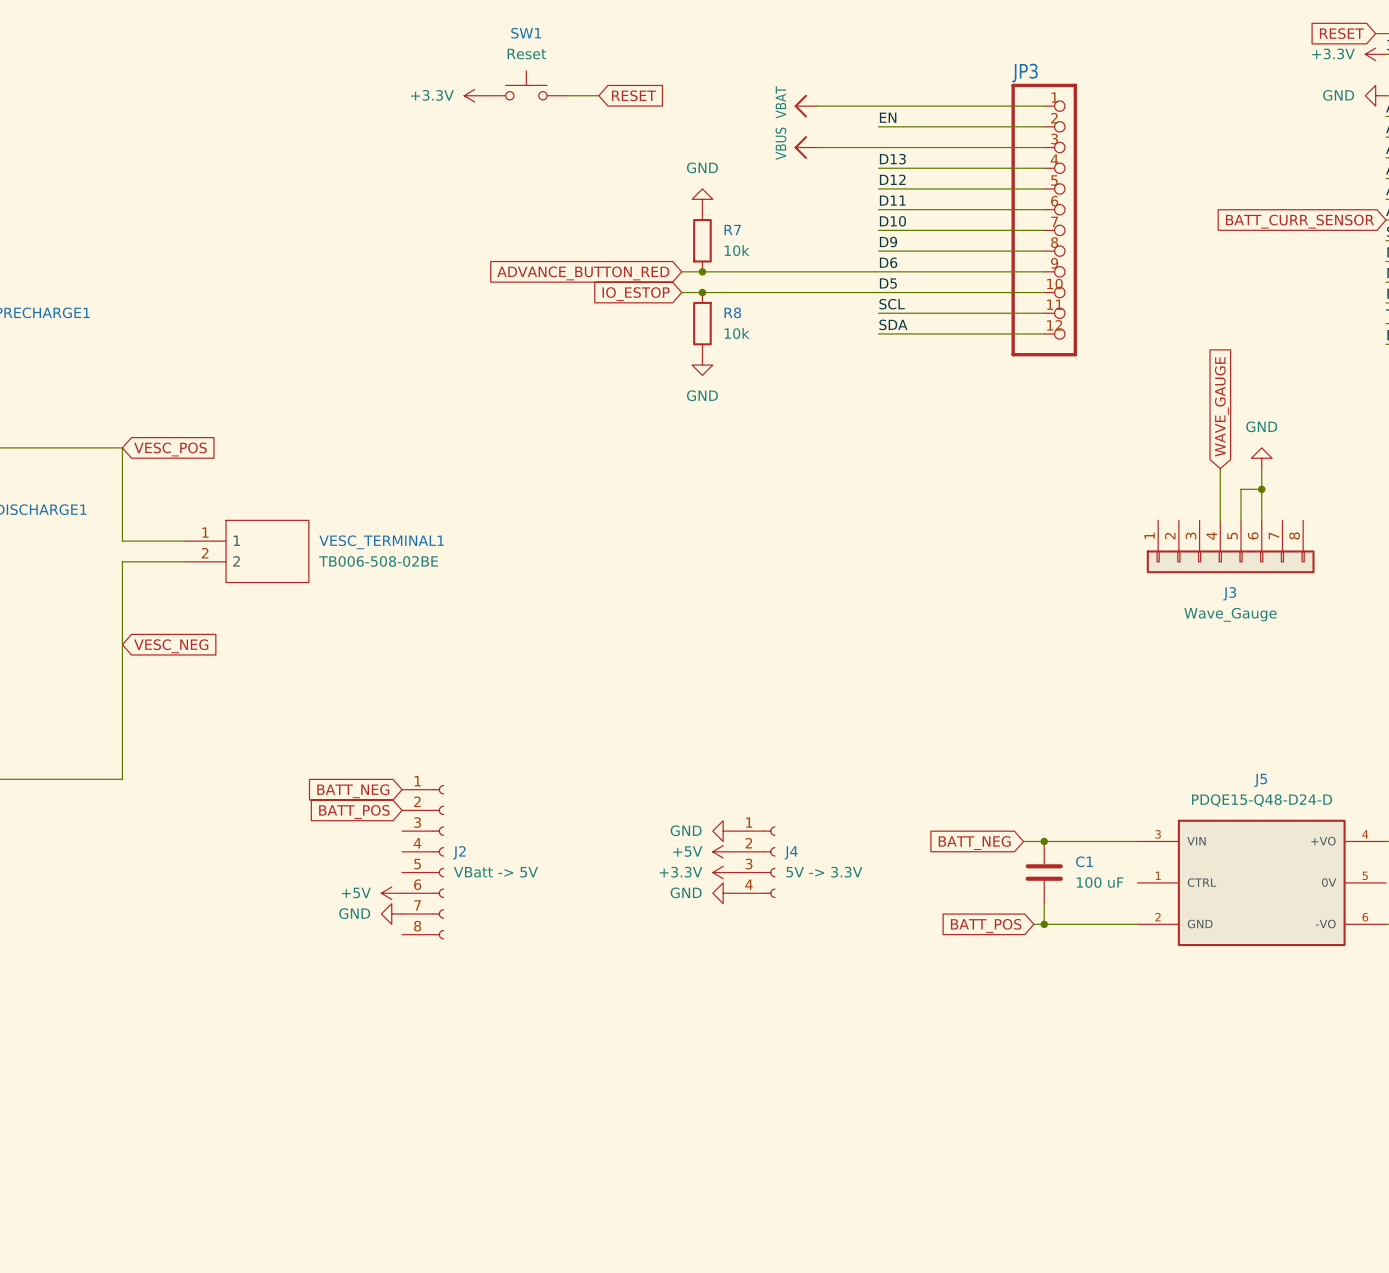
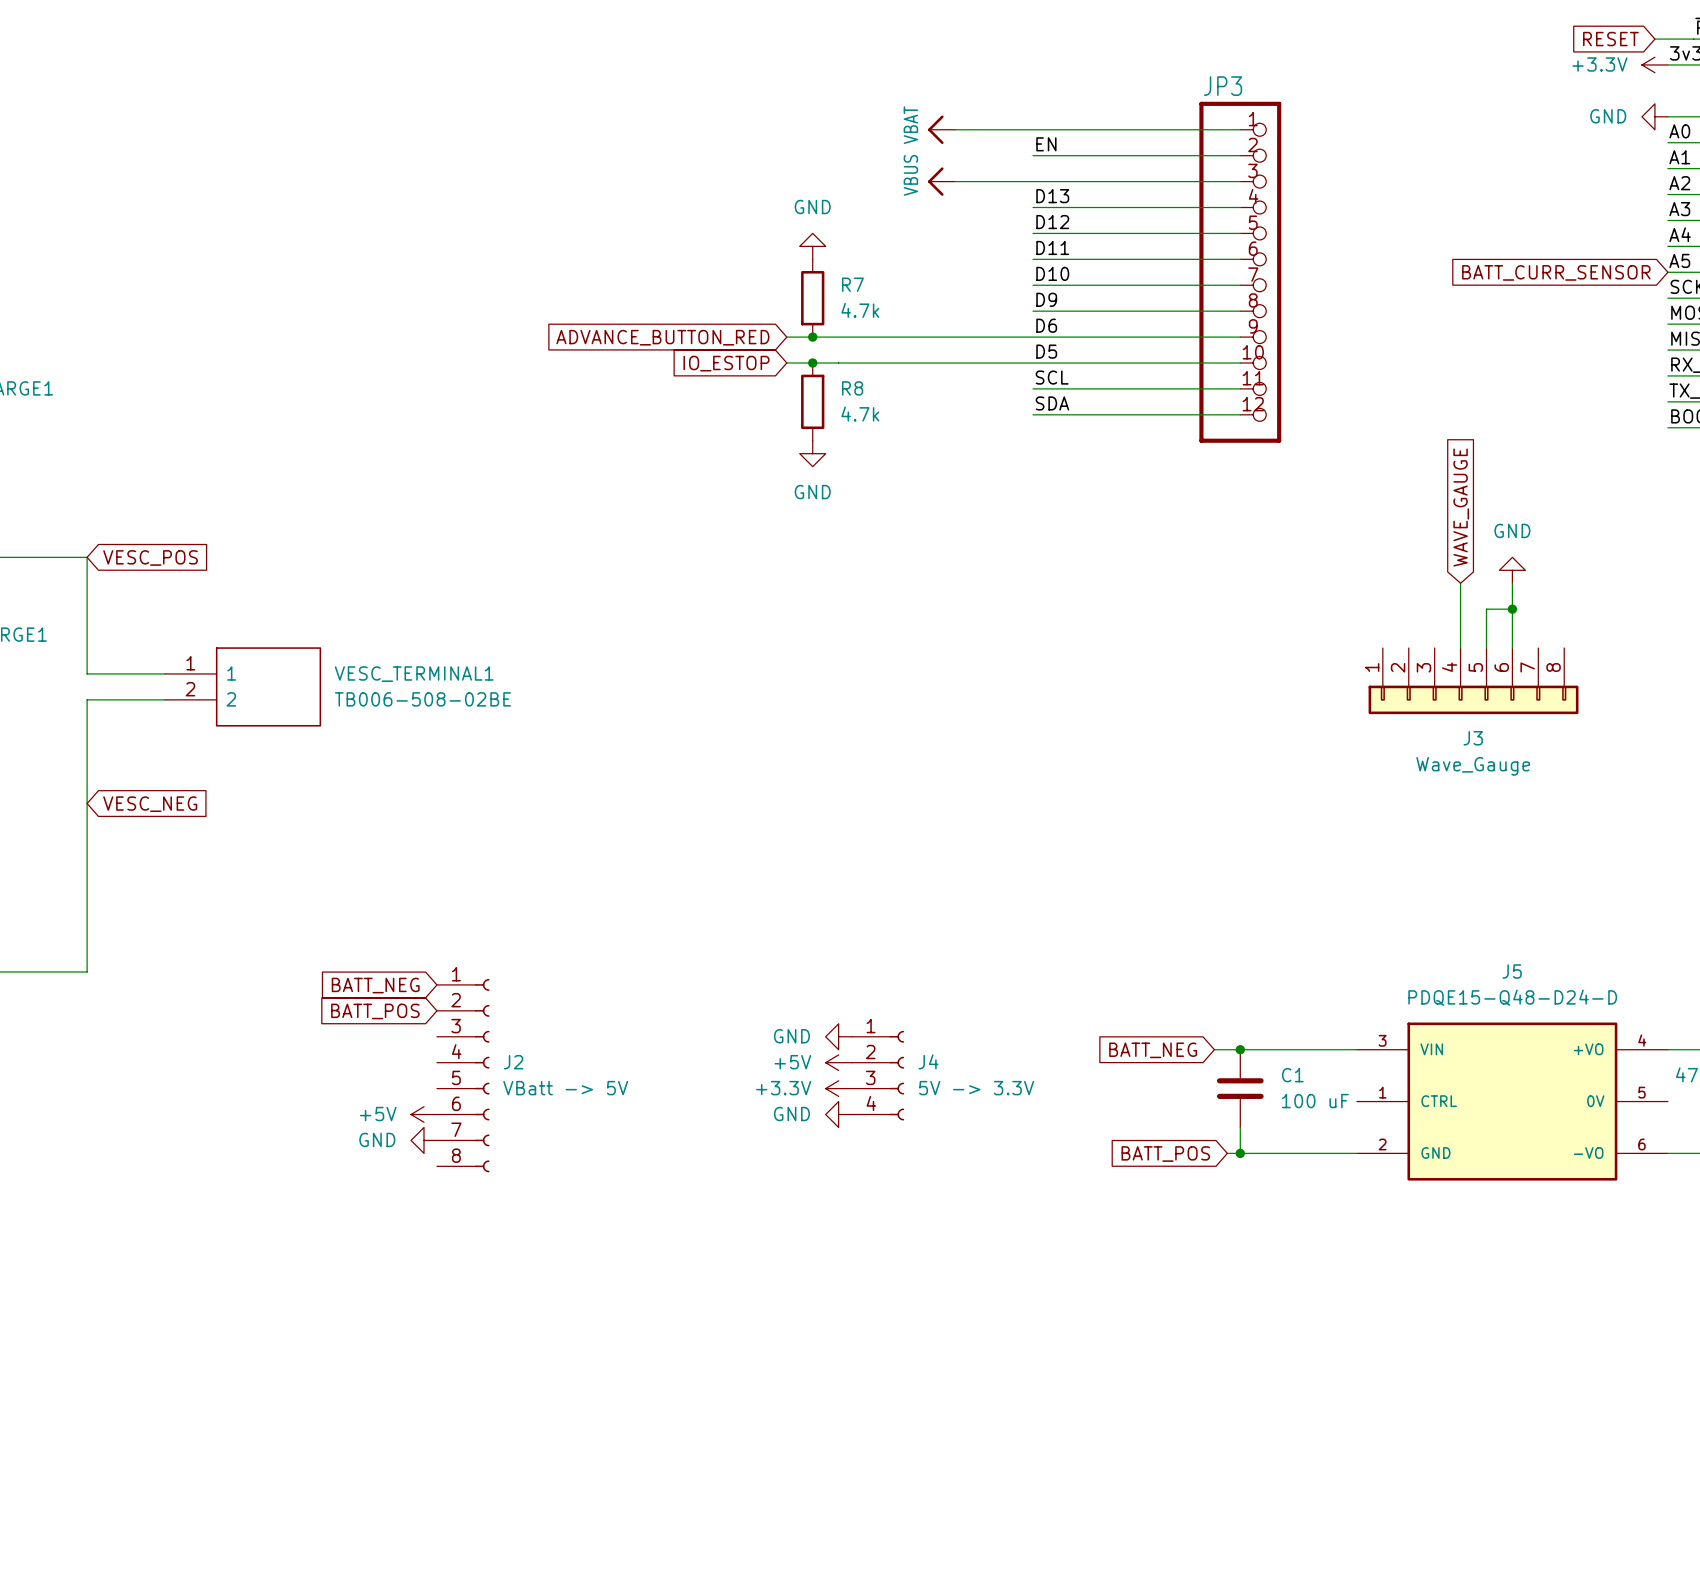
SW1: Reset (526, 85) -> none
power symbol: +3.3V (474, 95) -> none
wire: (567, 95) (598, 95) -> none
global label: RESET (633, 95) -> none
R7 value: 10k (737, 250) -> 4.7k (860, 310)
R8 value: 10k (737, 333) -> 4.7k (860, 414)

